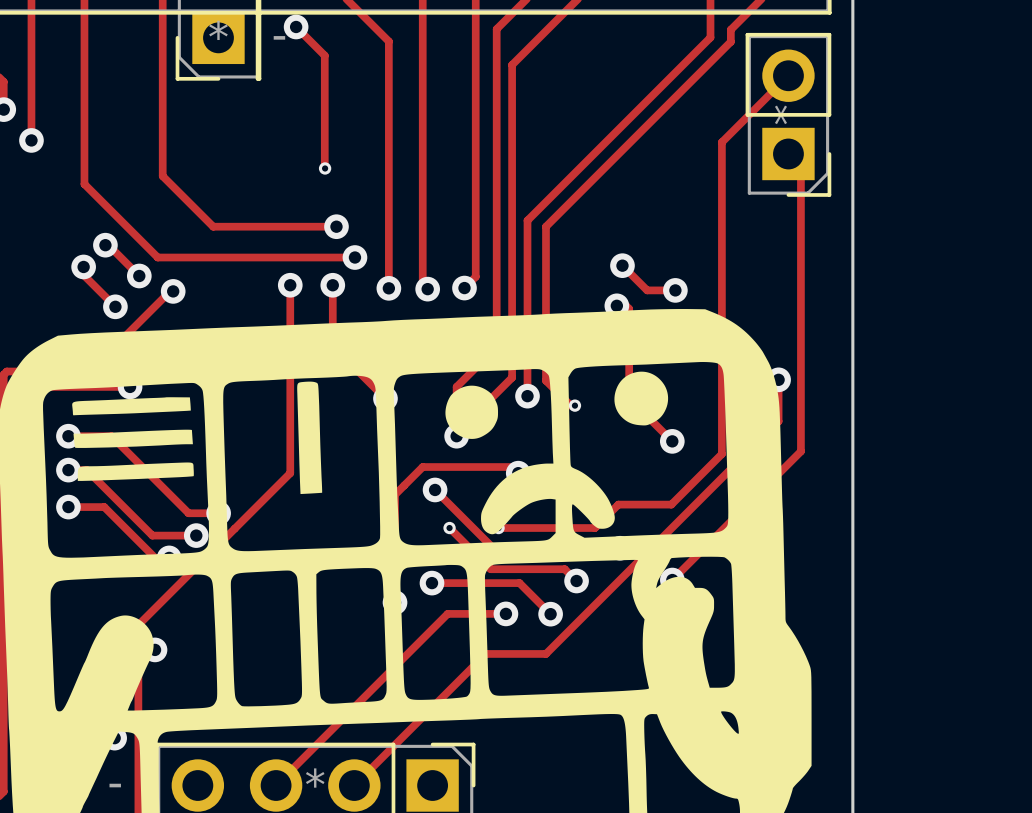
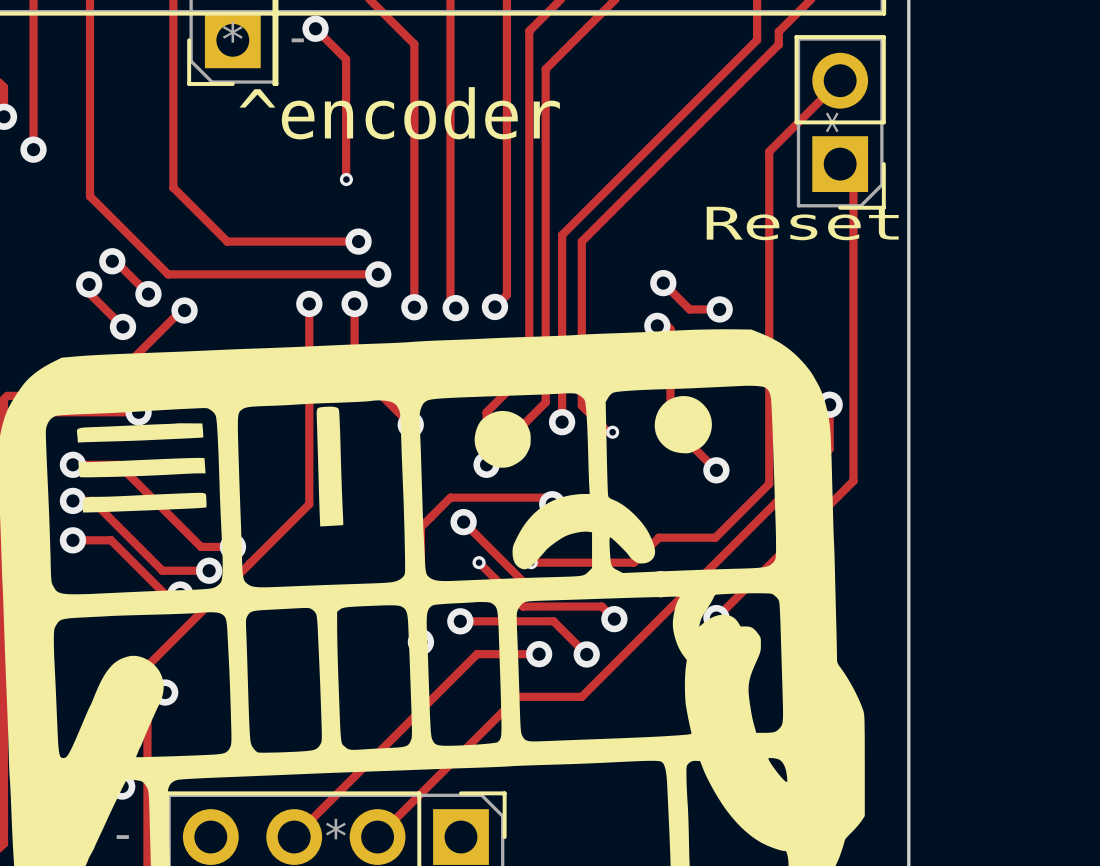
text: none -> ^encoder (399, 113)
text: none -> Reset (802, 223)

